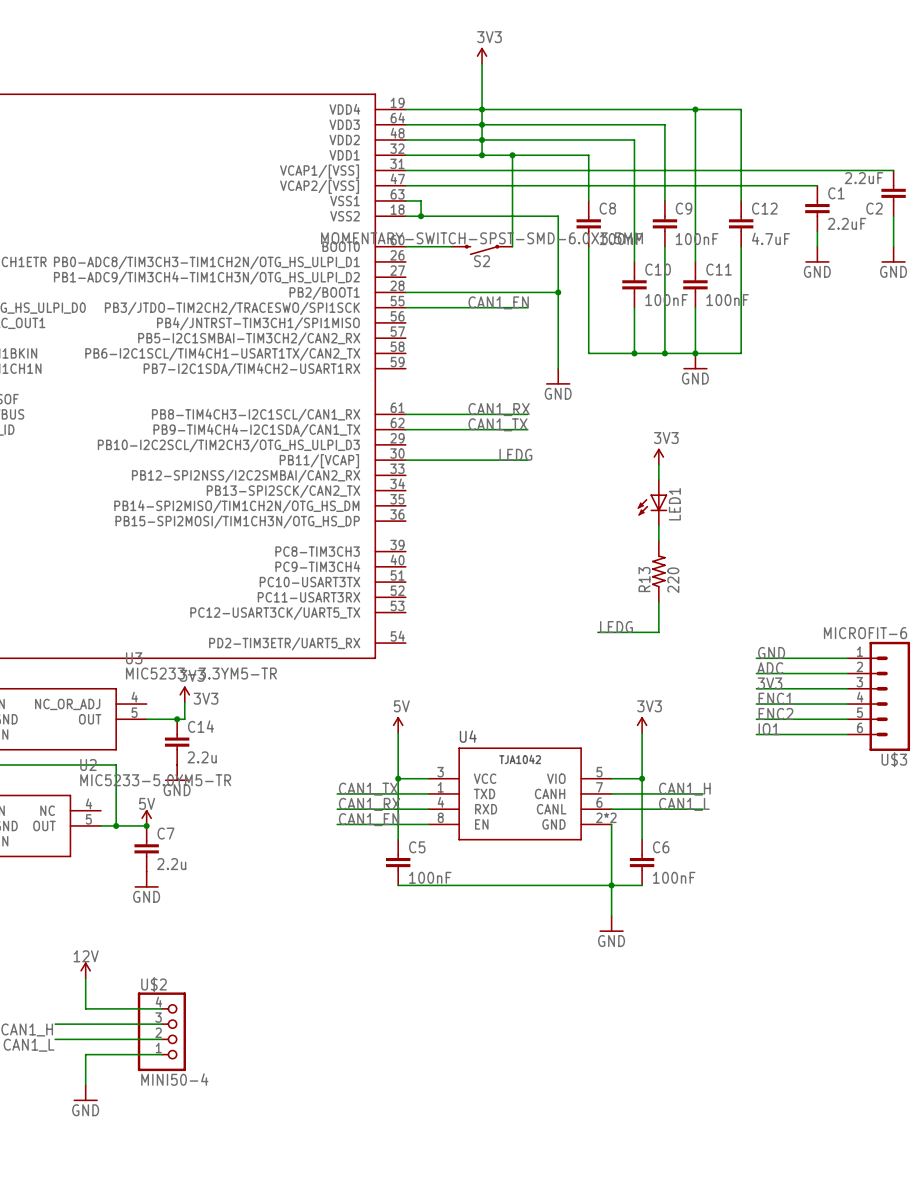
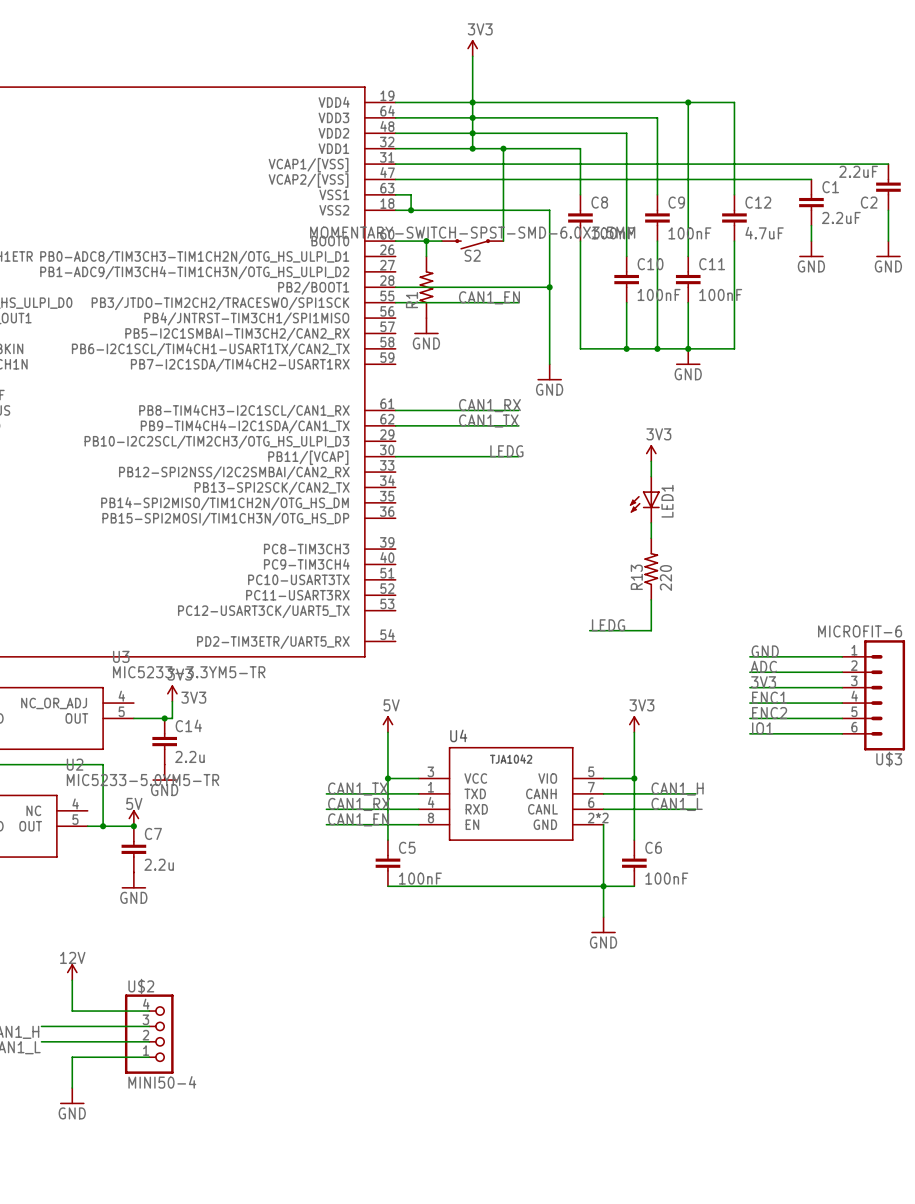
wire: none -> (426, 241) (426, 256)
junction: none -> (426, 241)
R1: none -> (426, 287)
power symbol: none -> GND (426, 326)

